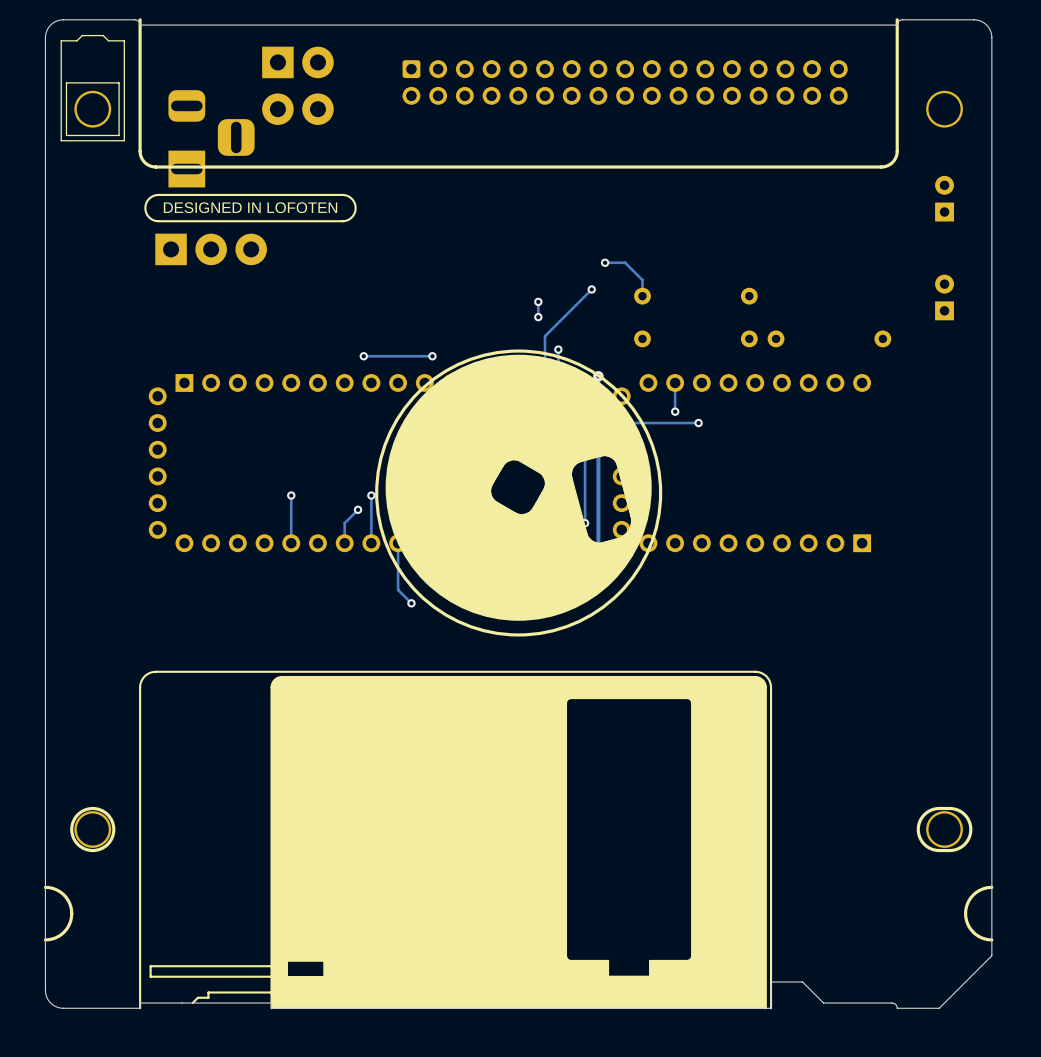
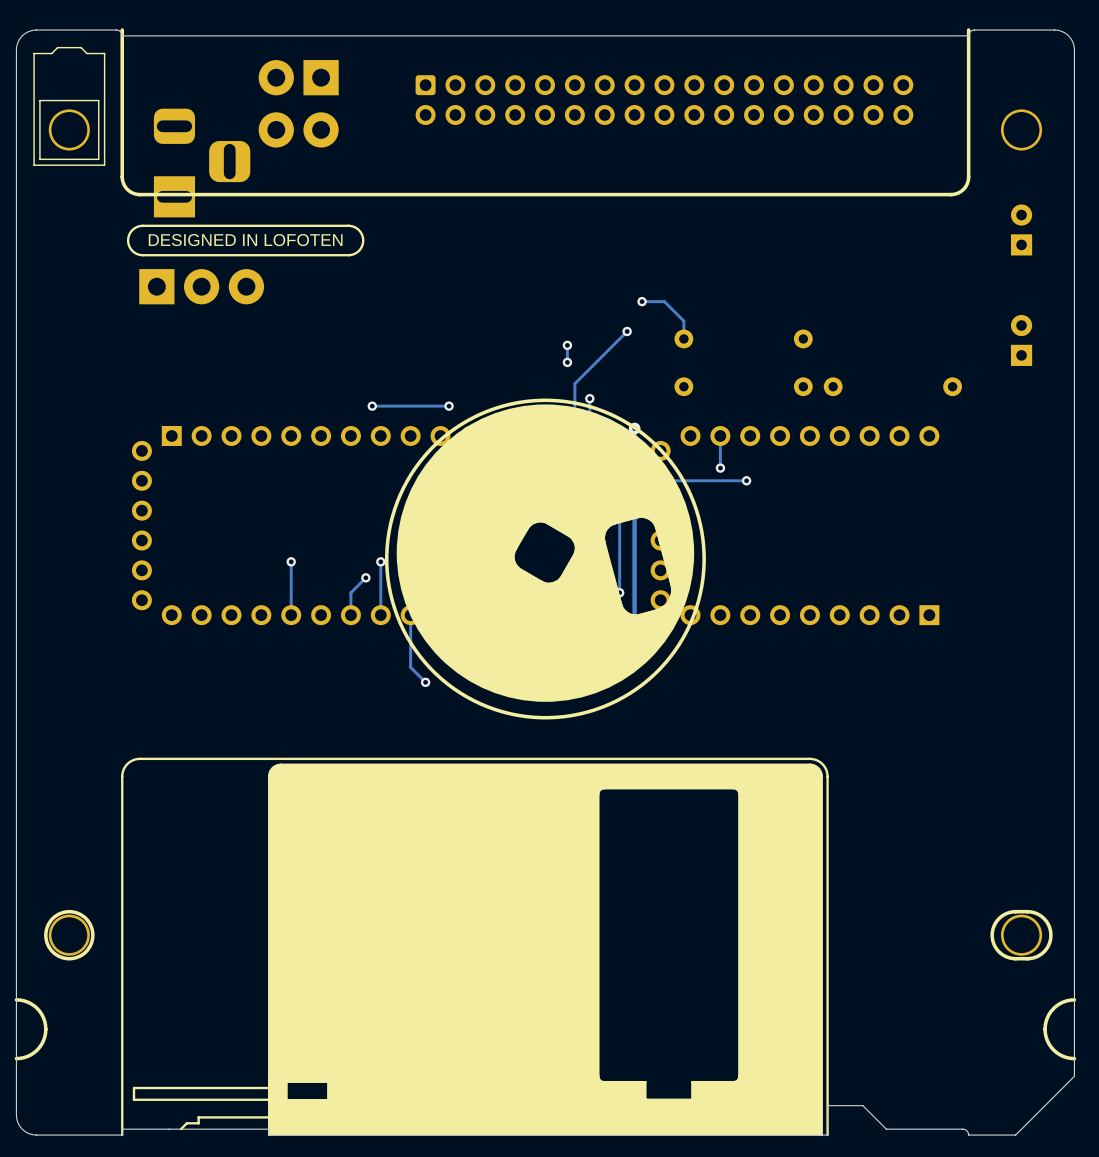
part footprint: [262, 46, 334, 125] -> [258, 60, 339, 148]

